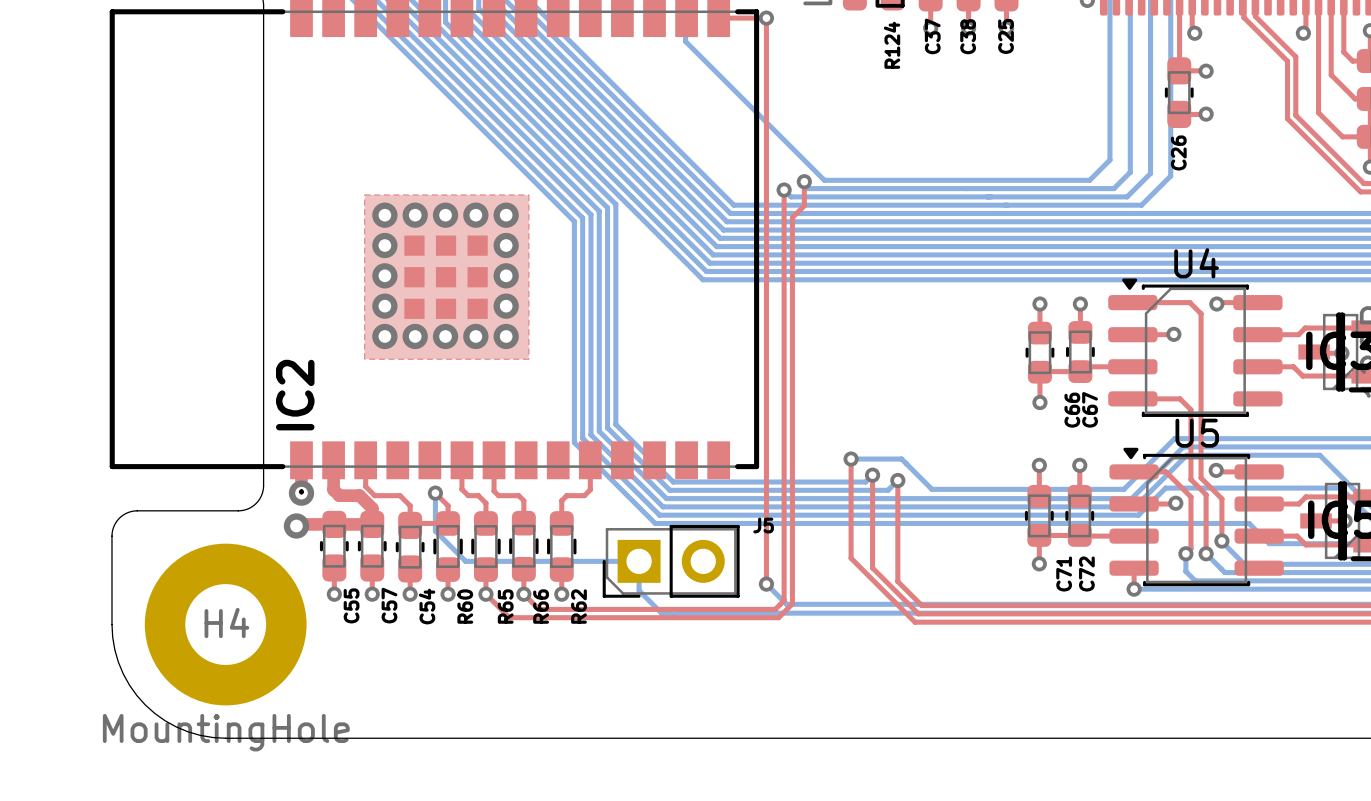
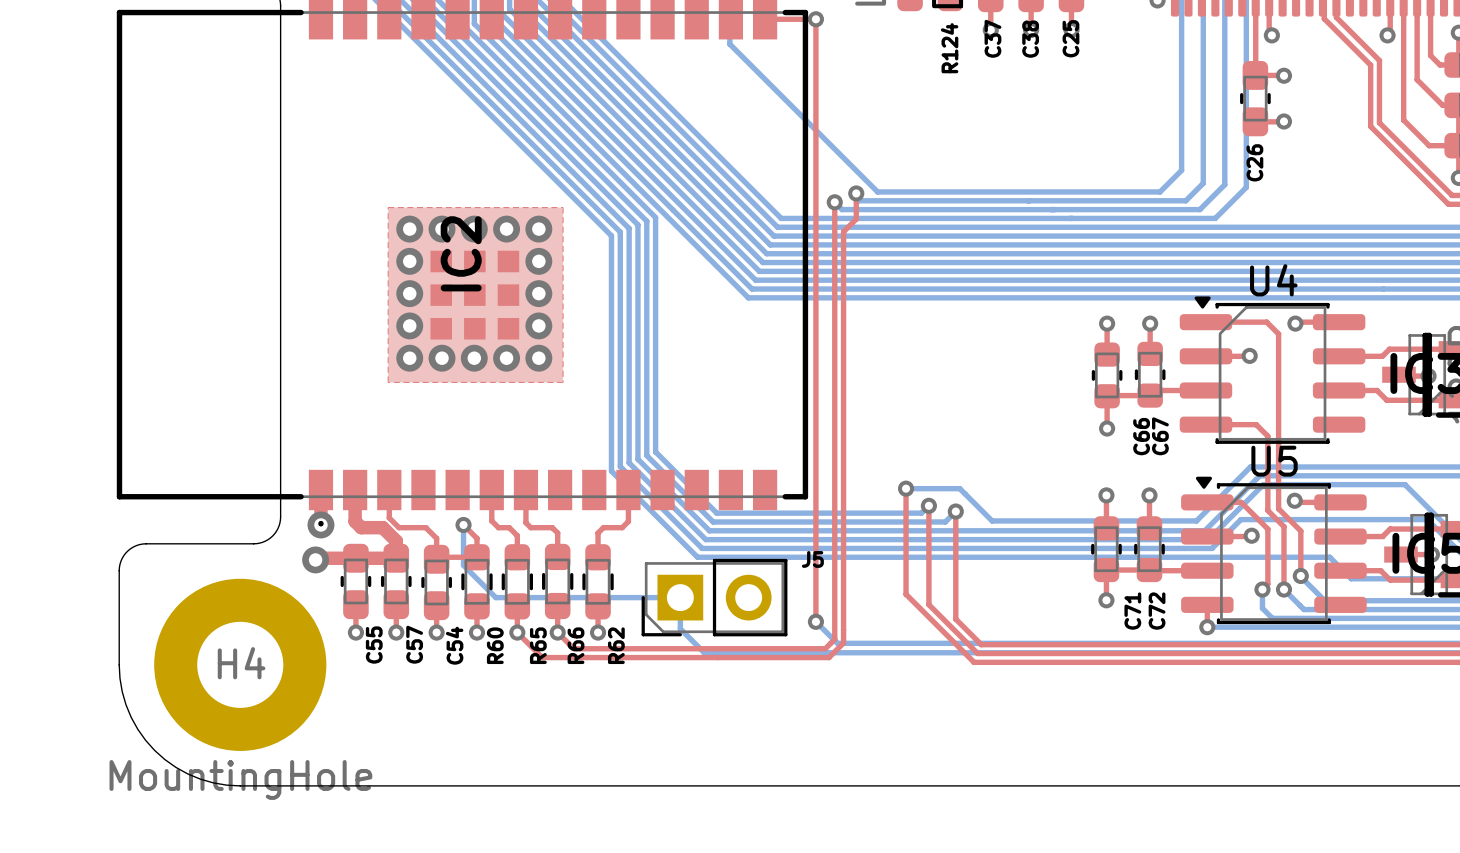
IC2 name position: IC2 (295, 395) -> IC2 (461, 253)

